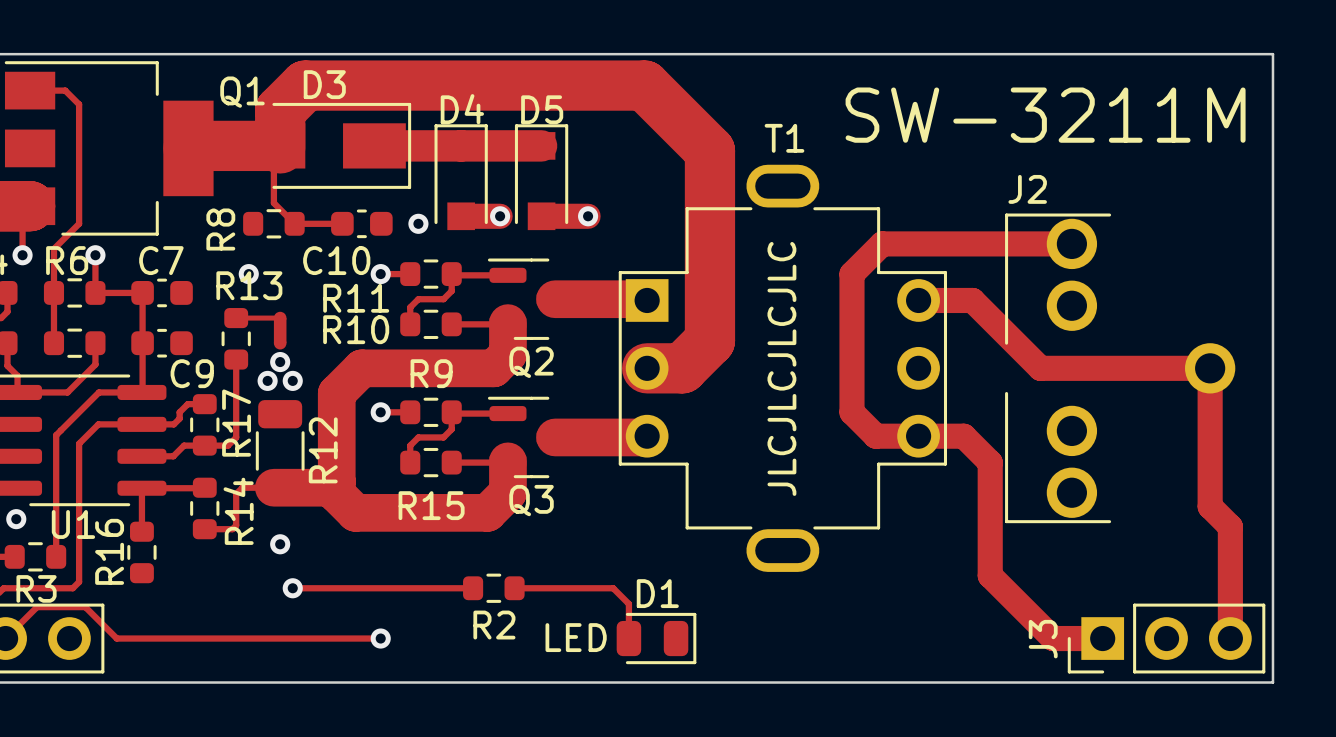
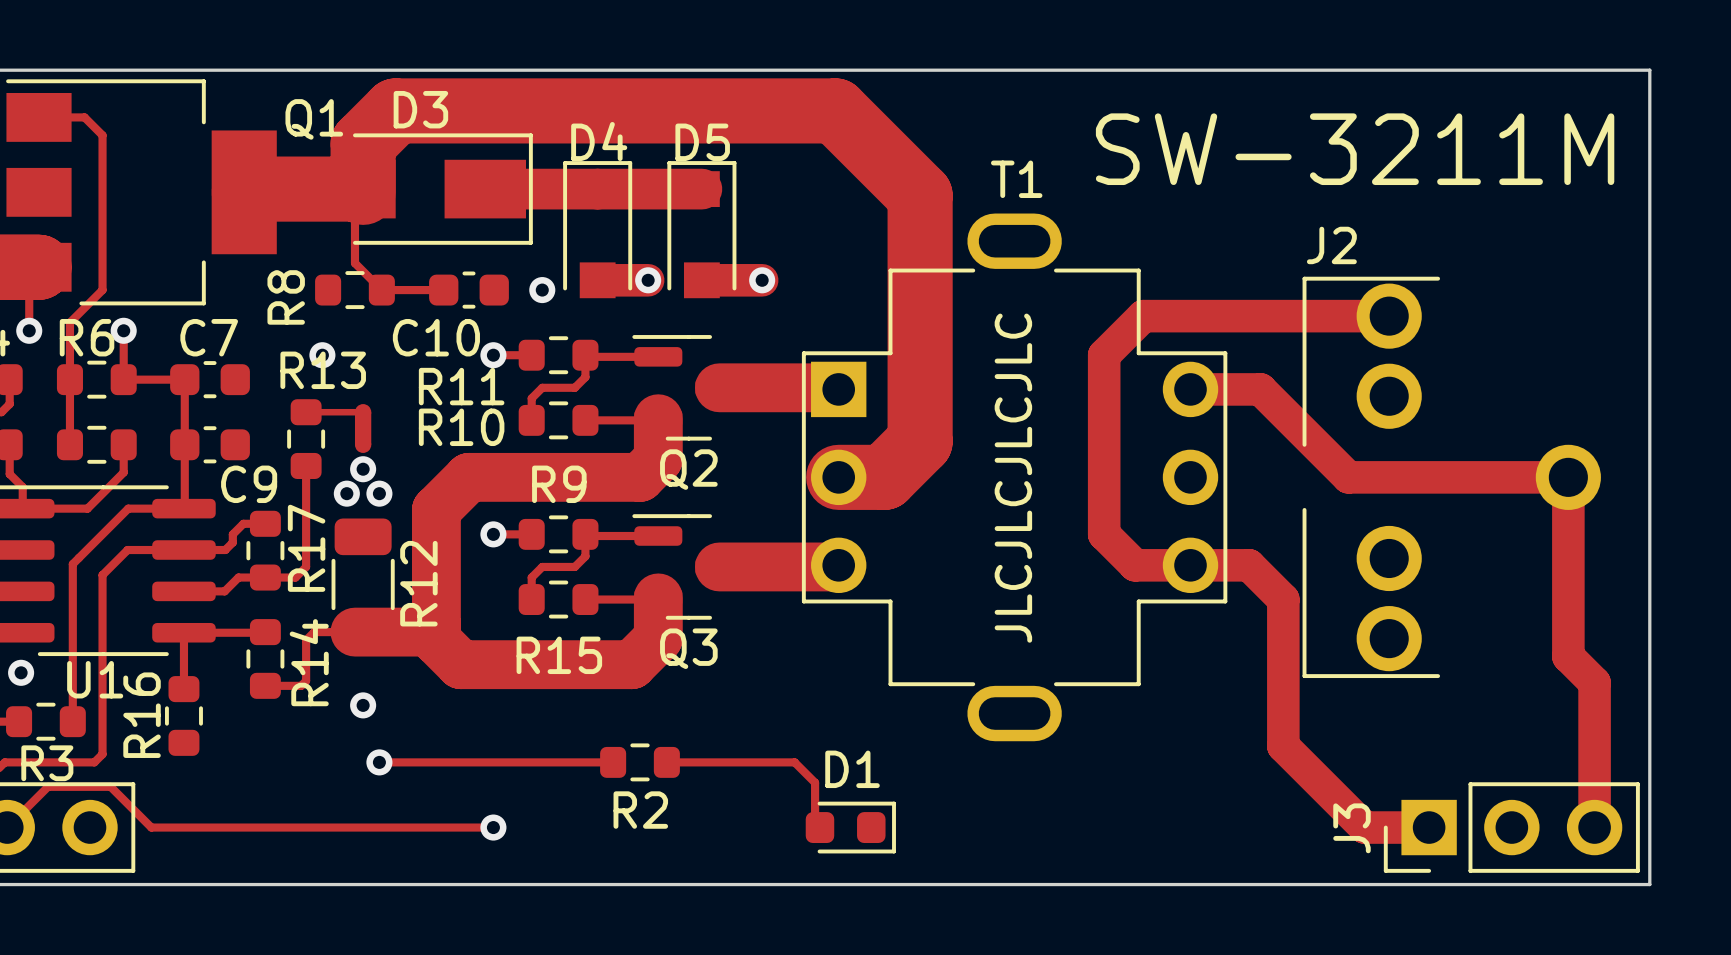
D1 footprint: [616, 612, 697, 665] -> [805, 801, 896, 854]
D1 value: LED (576, 637) -> none

